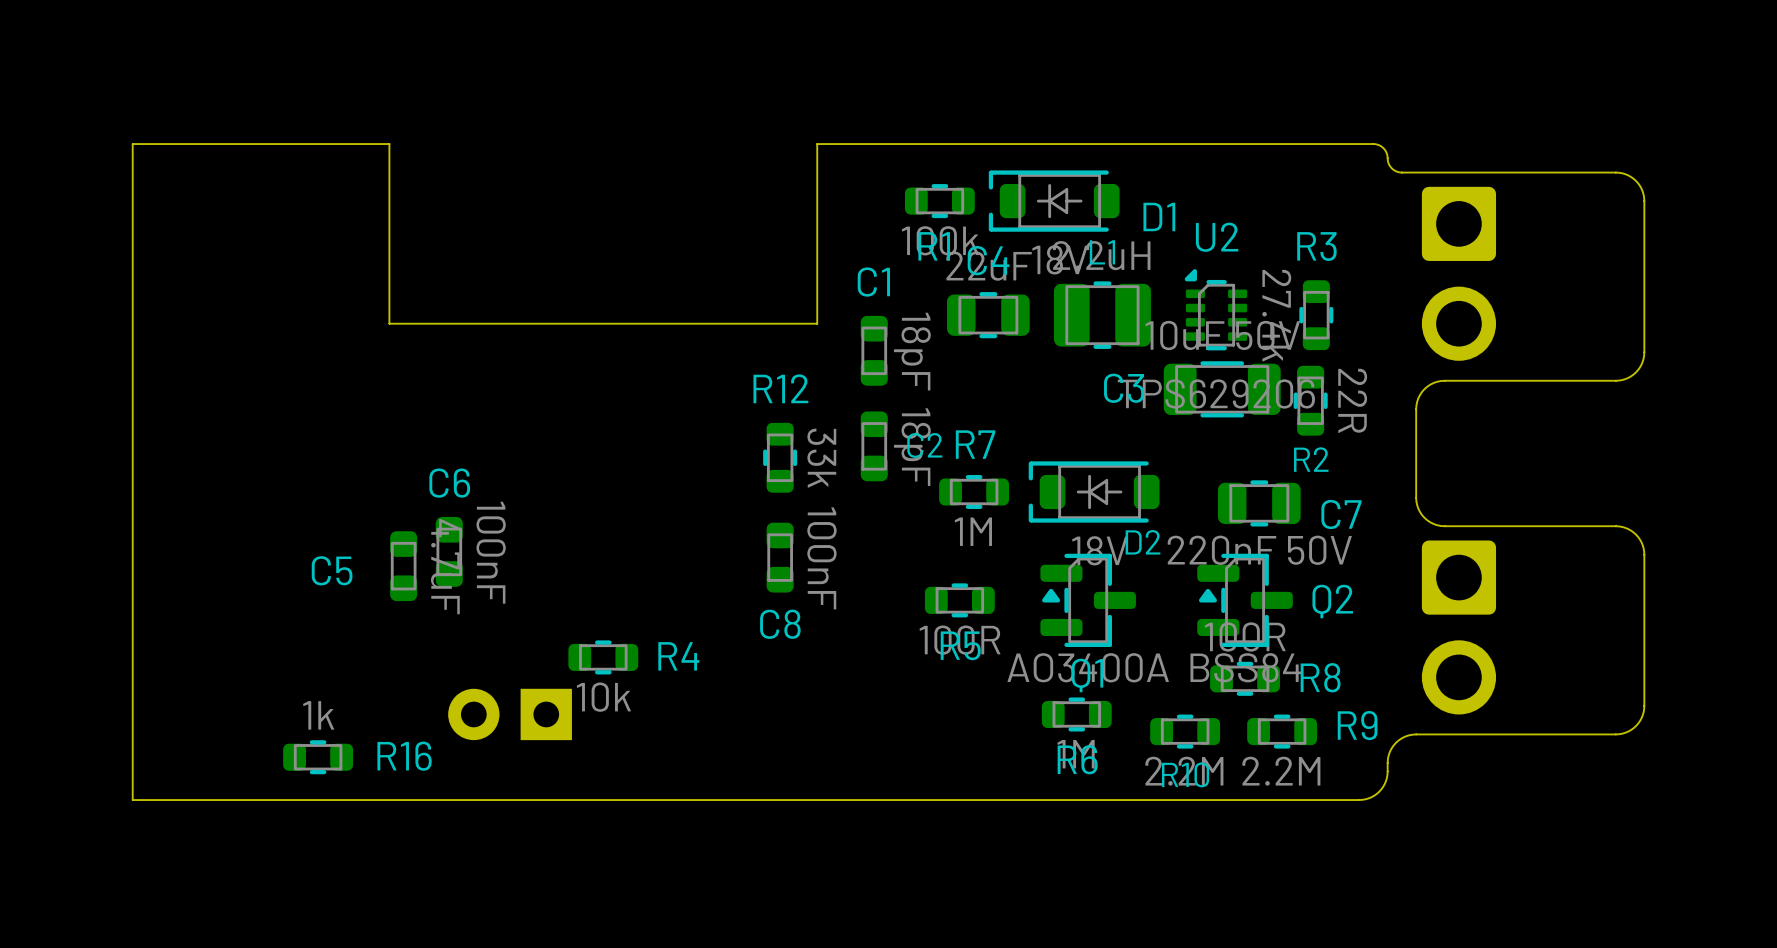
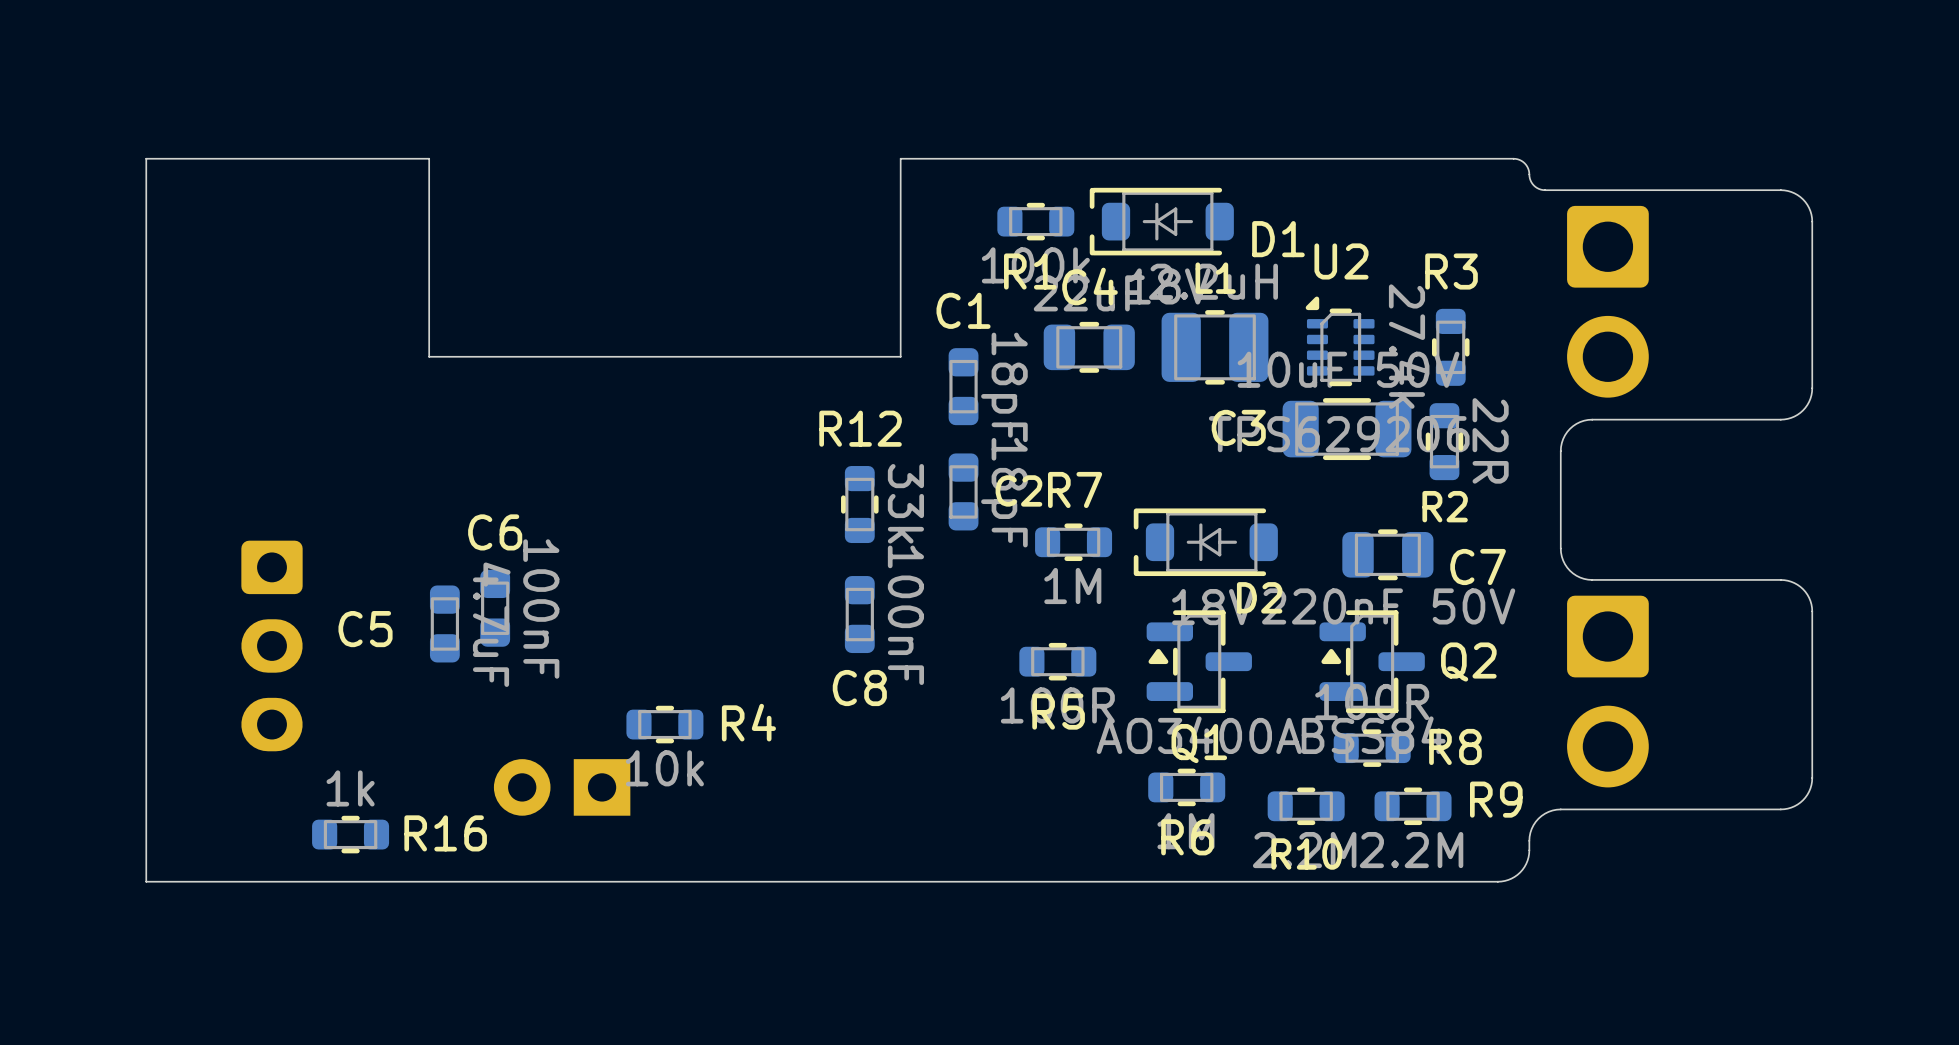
part: none -> (272, 645)

